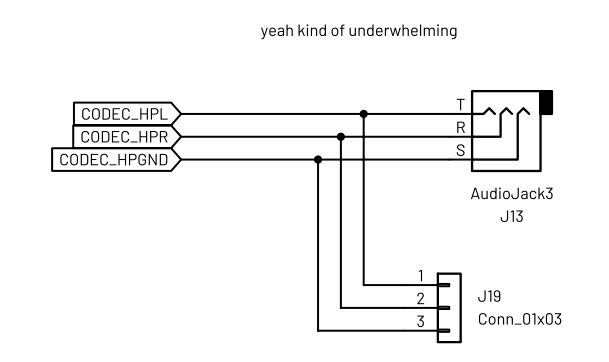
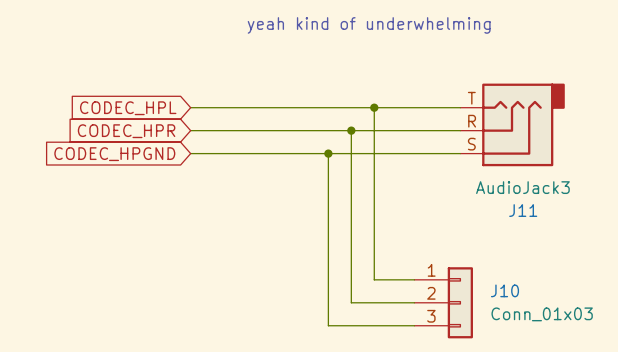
J13 name: J13 (511, 216) -> J11 (523, 210)
J19 name: J19 (489, 296) -> J10 (504, 290)

